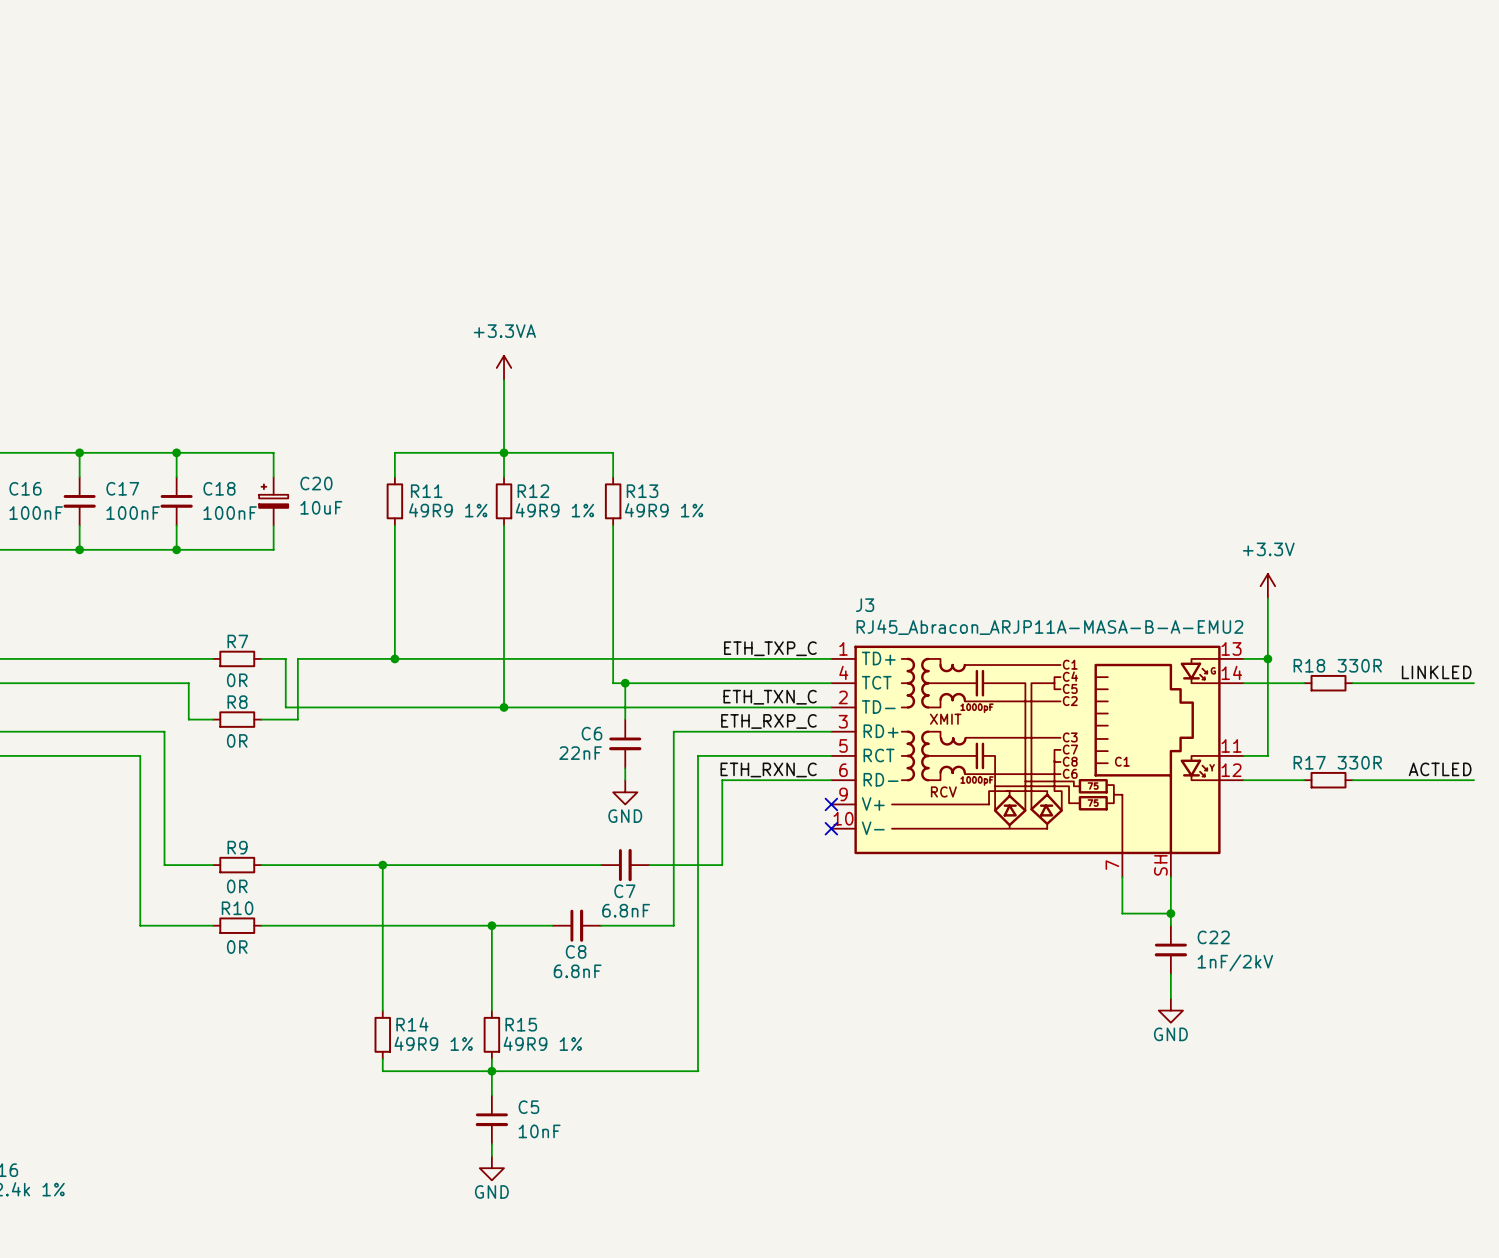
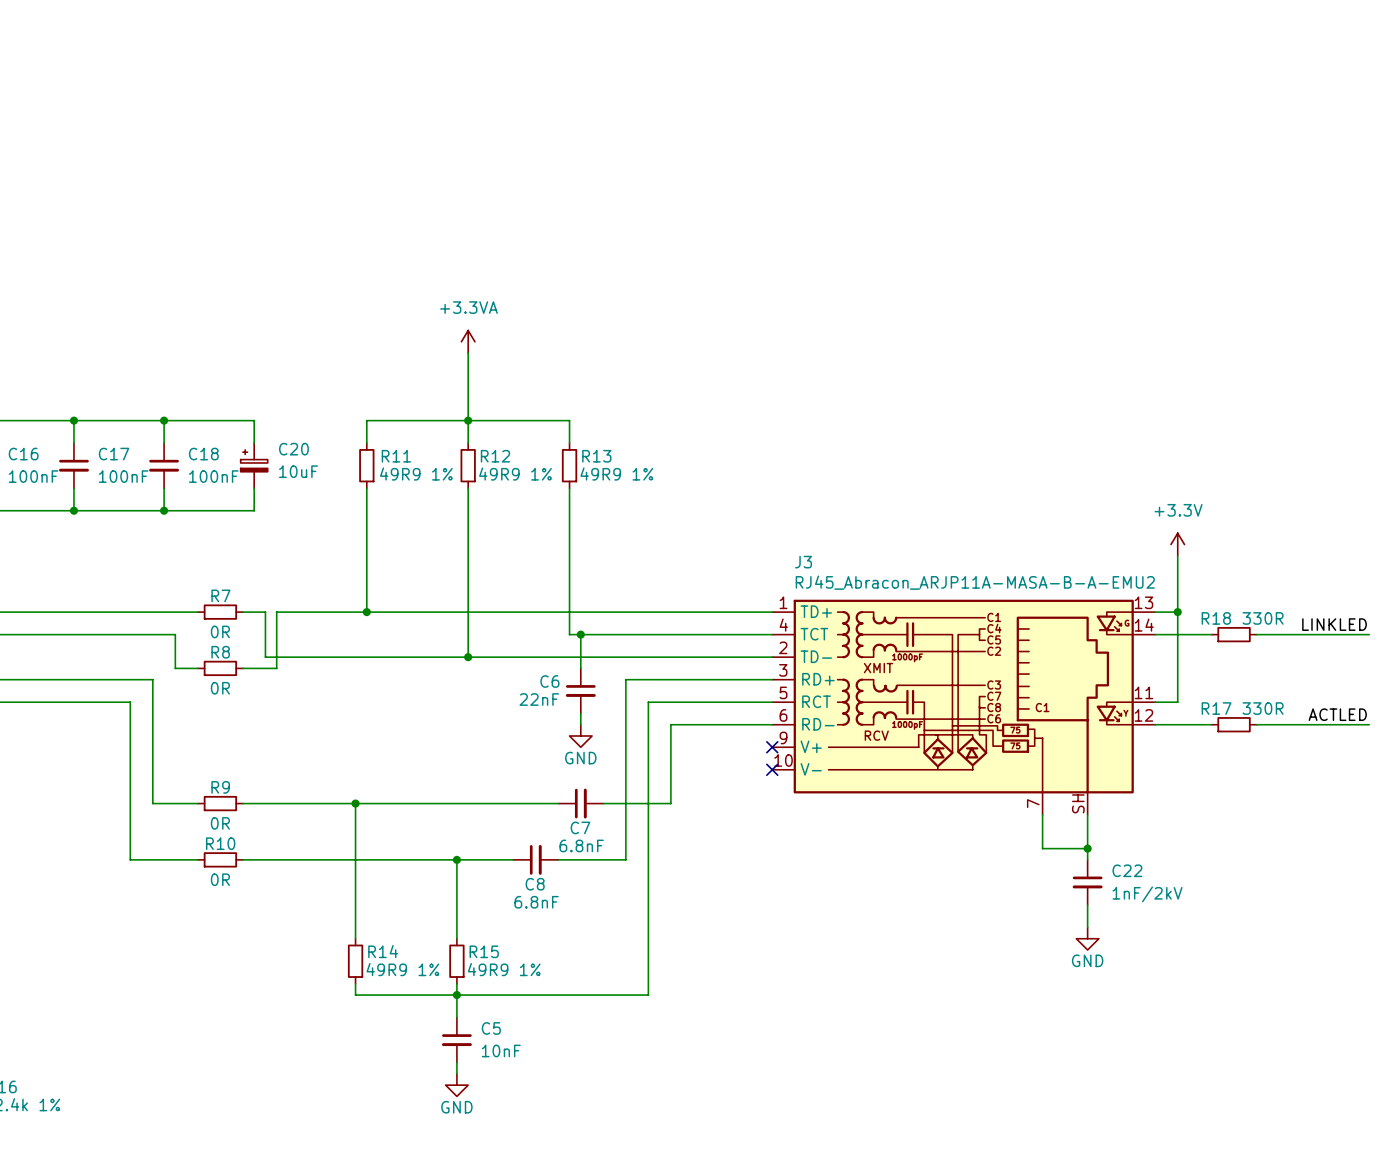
label: ETH_TXP_C (770, 648) -> none
label: ETH_TXN_C (770, 697) -> none
label: ETH_RXP_C (768, 721) -> none
label: ETH_RXN_C (768, 769) -> none

